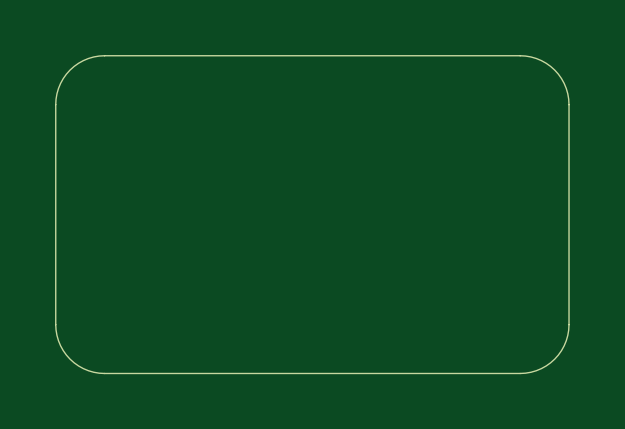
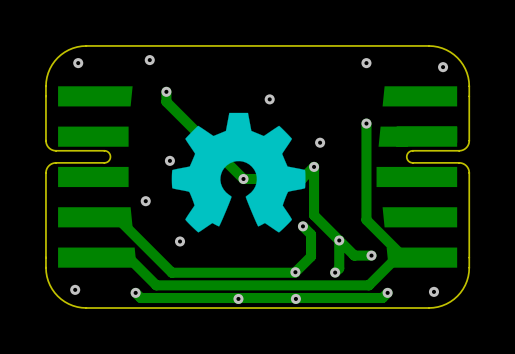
via: none -> (149, 60)
via: none -> (78, 63)
via: none -> (366, 63)
via: none -> (443, 67)
track: none -> (166, 91) (166, 101) (243, 179) (301, 179) (314, 166) (314, 215) (354, 255) (371, 255)
via: none -> (166, 91)
board edge: (55, 116) (55, 312) -> none
board edge: (569, 116) (569, 312) -> none
via: none -> (269, 99)
drawing: none -> [171, 112, 306, 233]
track: none -> (366, 123) (366, 219) (404, 257)
via: none -> (366, 123)
via: none -> (320, 142)
via: none -> (169, 160)
via: none -> (314, 166)
part: none -> (91, 176)
part: none -> (423, 176)
via: none -> (243, 179)
via: none -> (145, 201)
track: none -> (94, 217) (116, 217) (171, 272) (294, 272) (311, 256) (311, 234) (302, 226)
via: none -> (302, 226)
track: none -> (339, 240) (339, 268) (335, 272)
via: none -> (339, 240)
via: none -> (180, 241)
via: none -> (371, 255)
track: none -> (422, 257) (396, 257) (368, 285) (156, 285) (128, 257) (96, 257)
via: none -> (295, 272)
via: none -> (335, 272)
via: none -> (75, 289)
via: none -> (433, 291)
via: none -> (135, 292)
track: none -> (387, 292) (382, 298) (295, 298) (140, 298) (135, 292)
via: none -> (387, 292)
via: none -> (238, 298)
via: none -> (295, 298)

